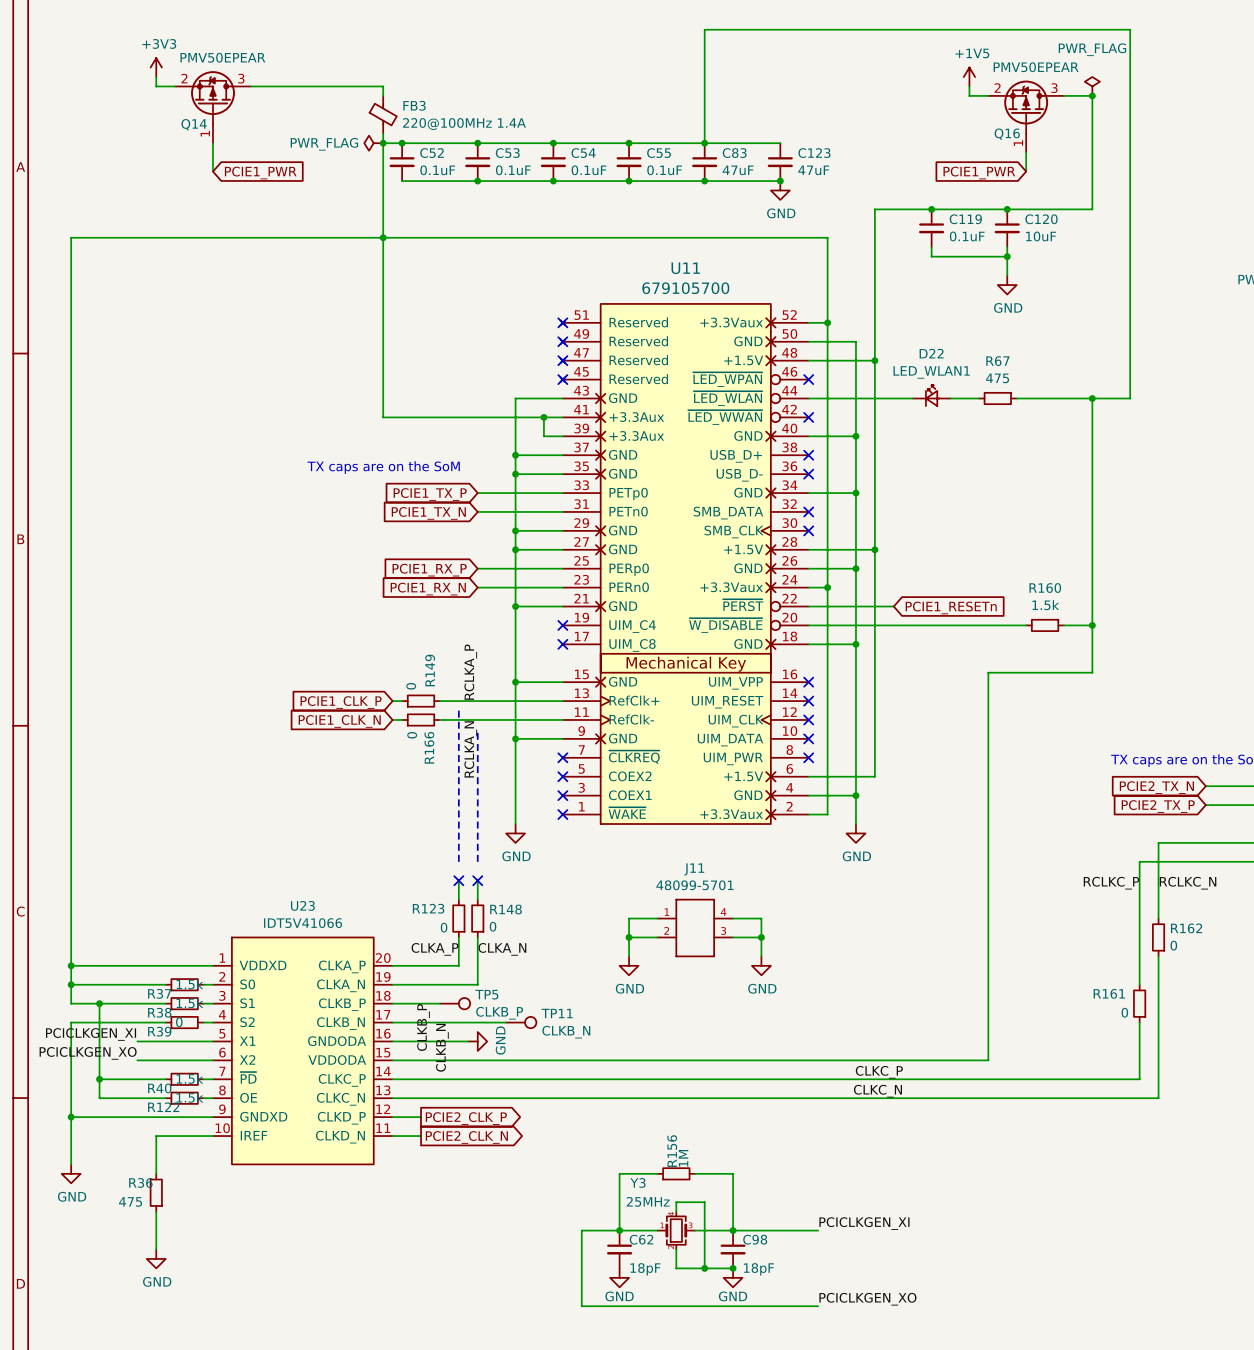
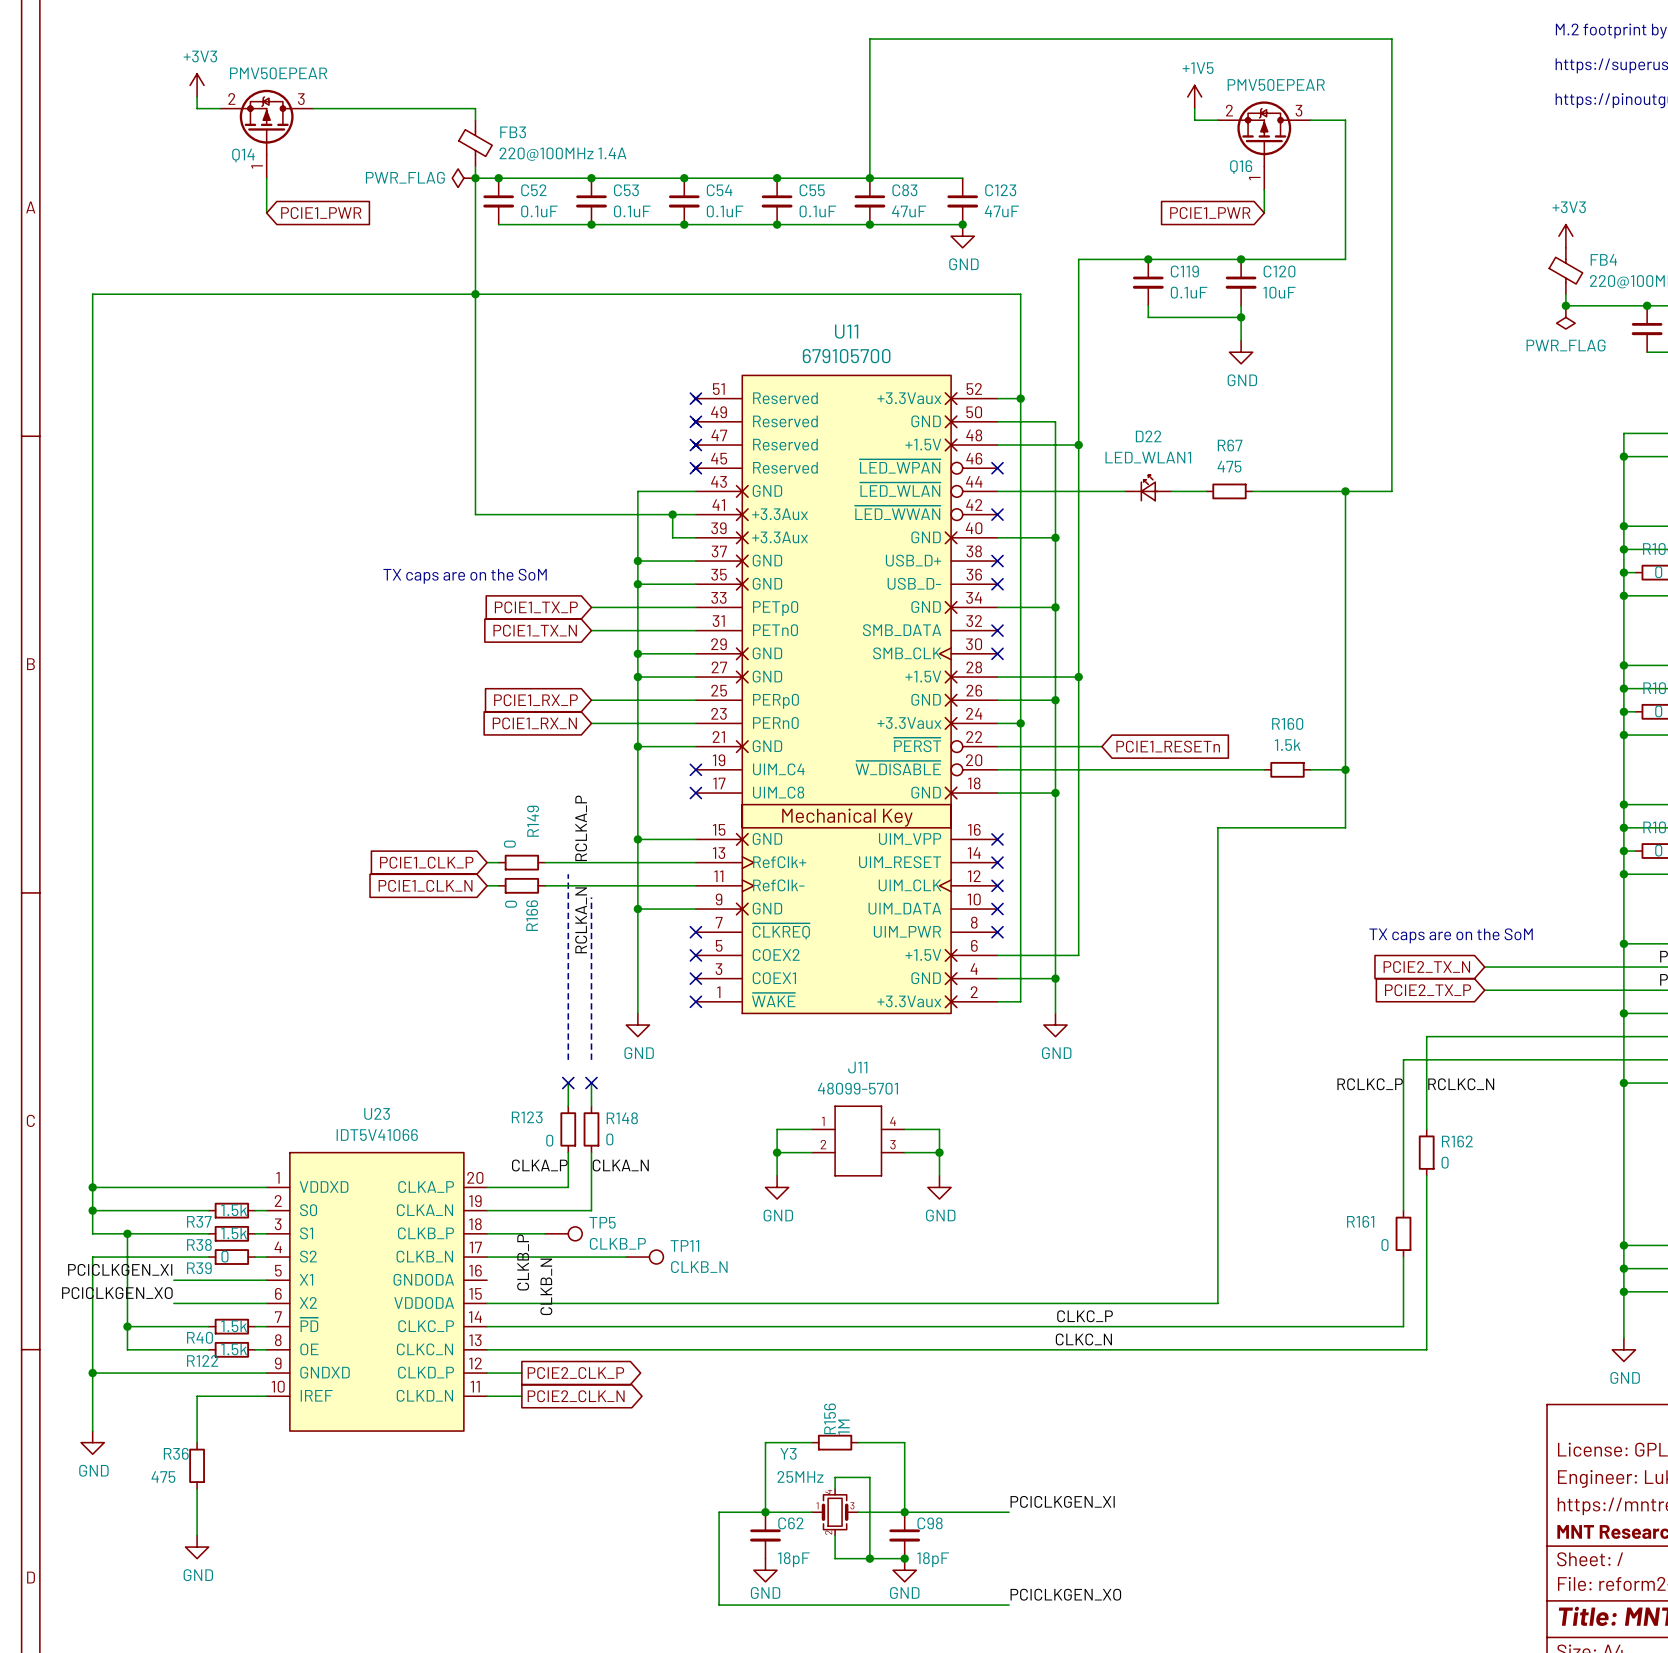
power symbol: PWR_FLAG (1092, 86) -> none
junction: (1092, 95) -> none
wire: (392, 1041) (468, 1041) -> none
power symbol: GND (477, 1041) -> none

